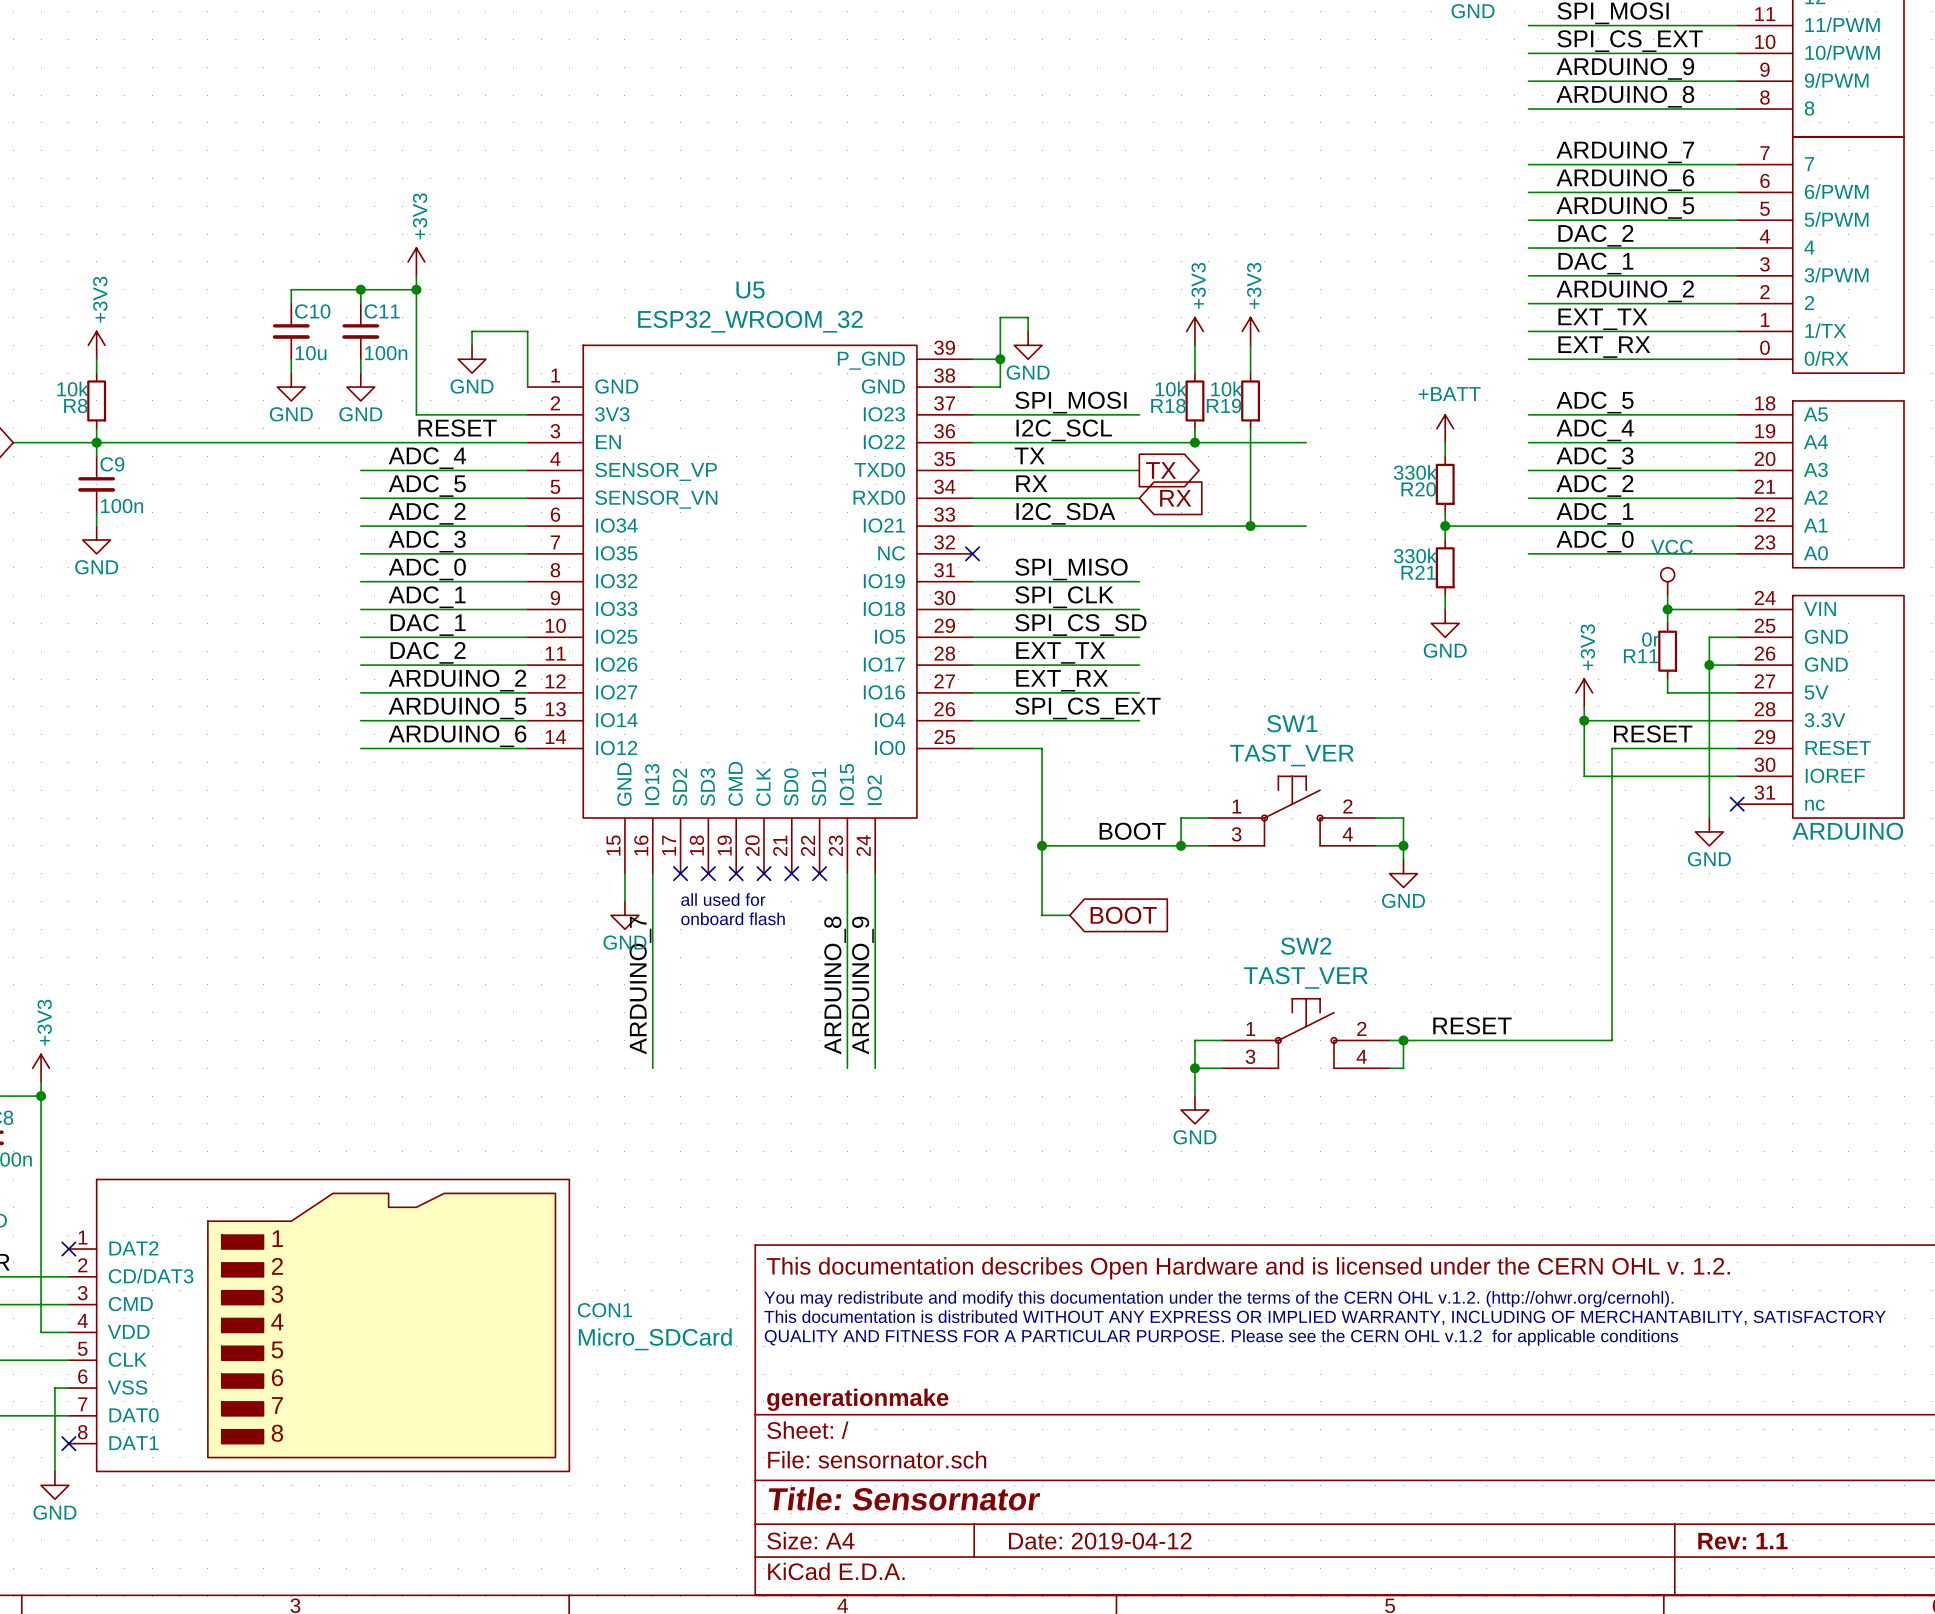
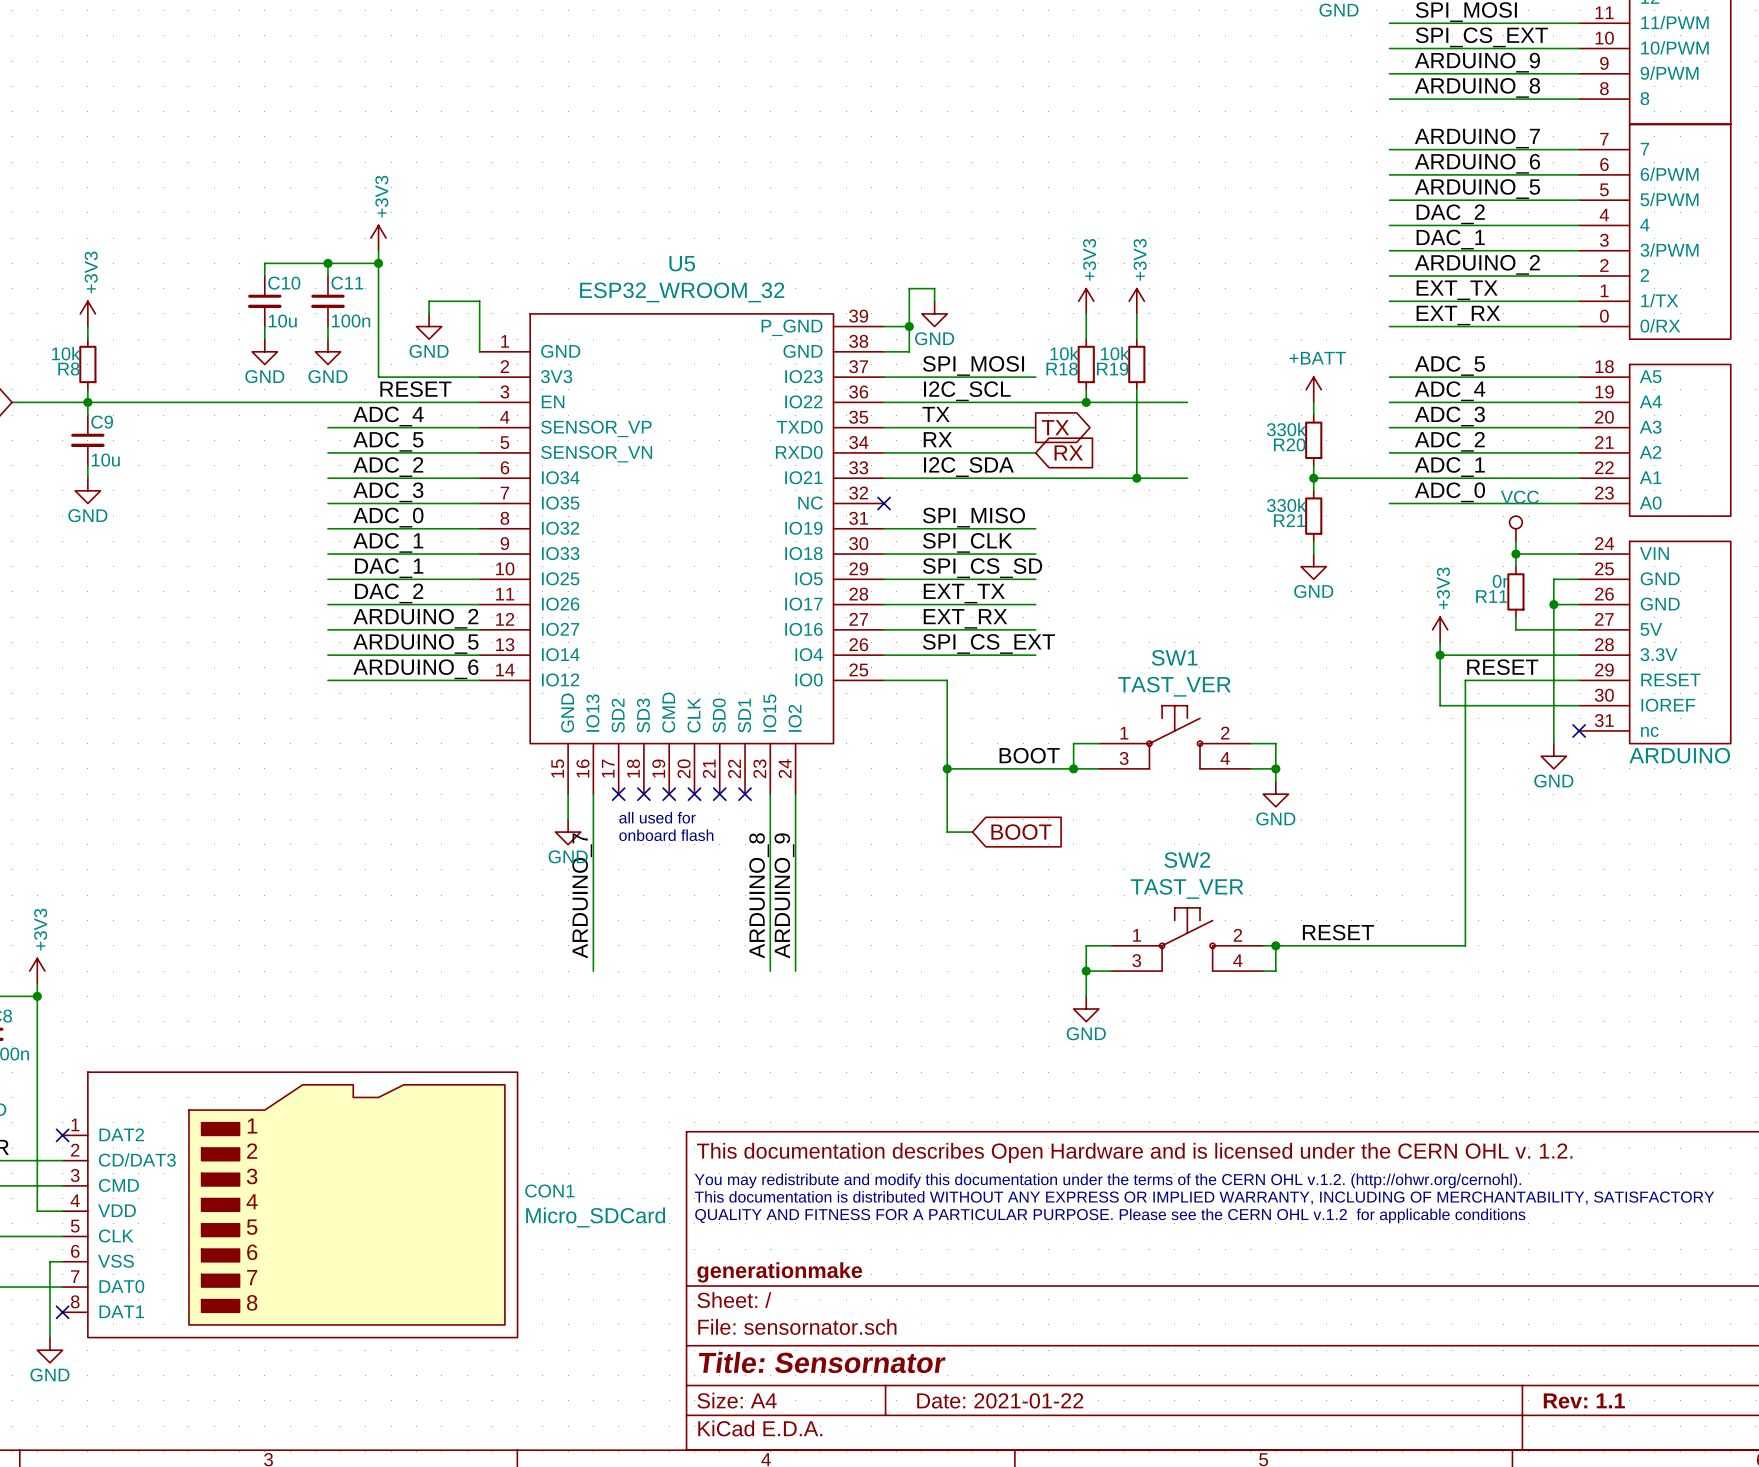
C9 value: 100n (122, 506) -> 10u (105, 460)
title block: Date: 2019-04-12 (1100, 1541) -> Date: 2021-01-22 (1000, 1400)

